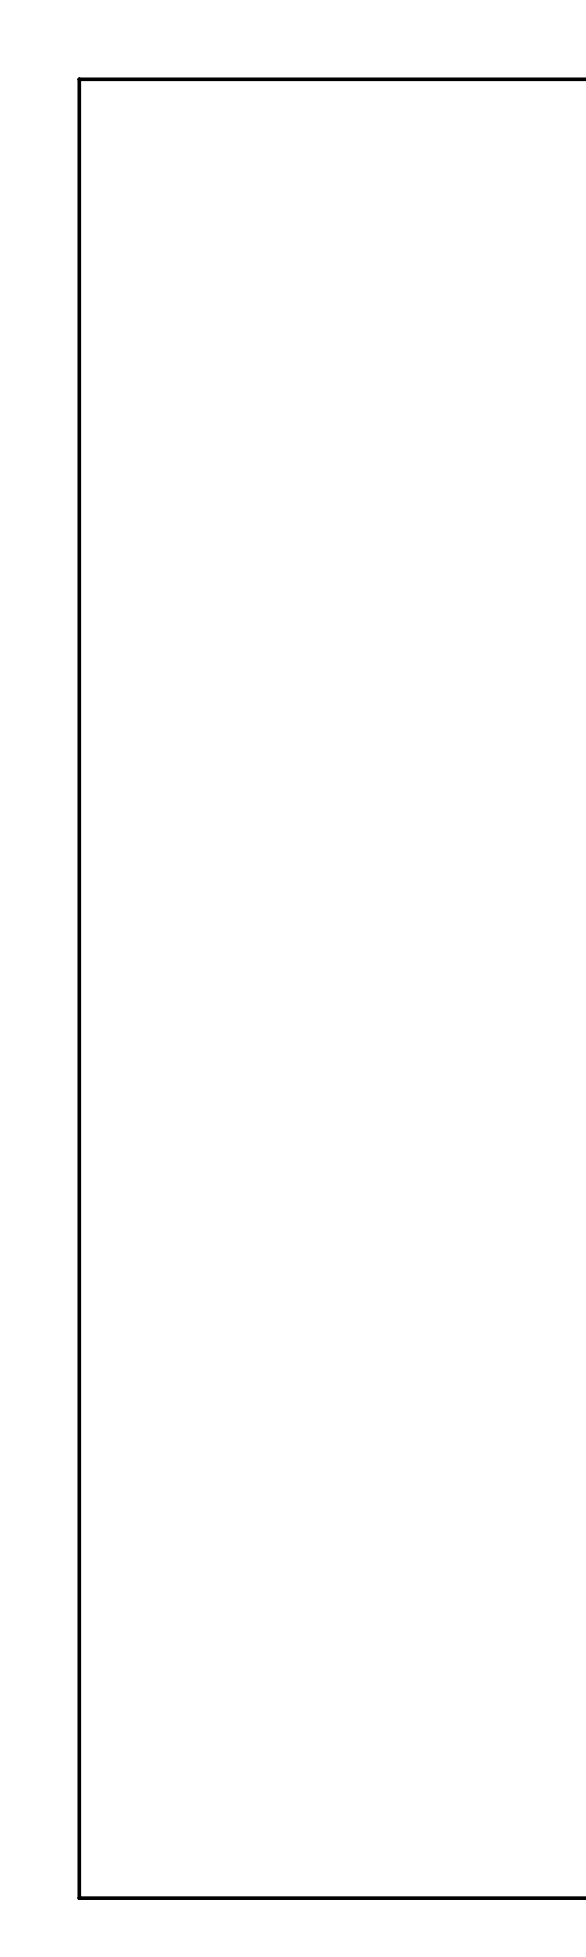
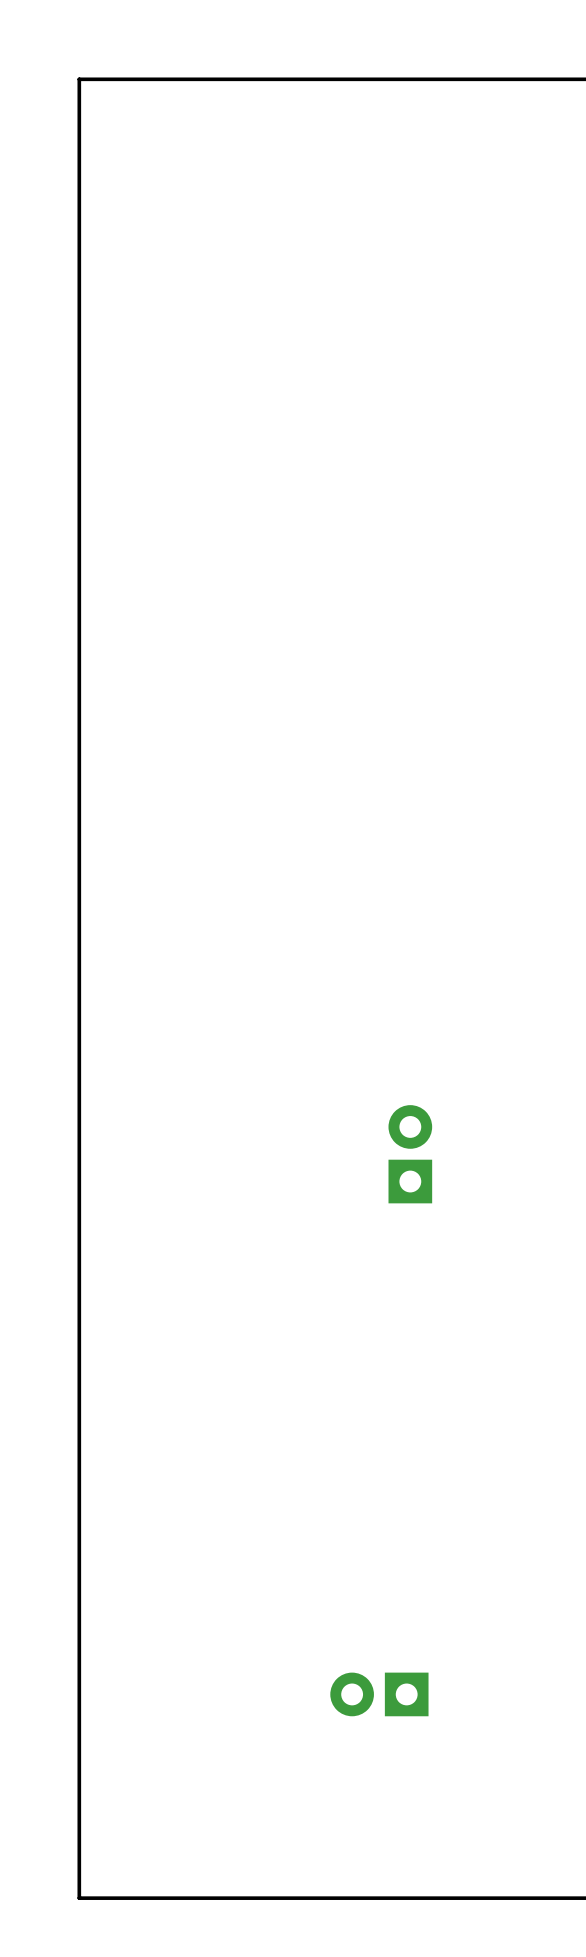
part: none -> (410, 1154)
part: none -> (379, 1694)

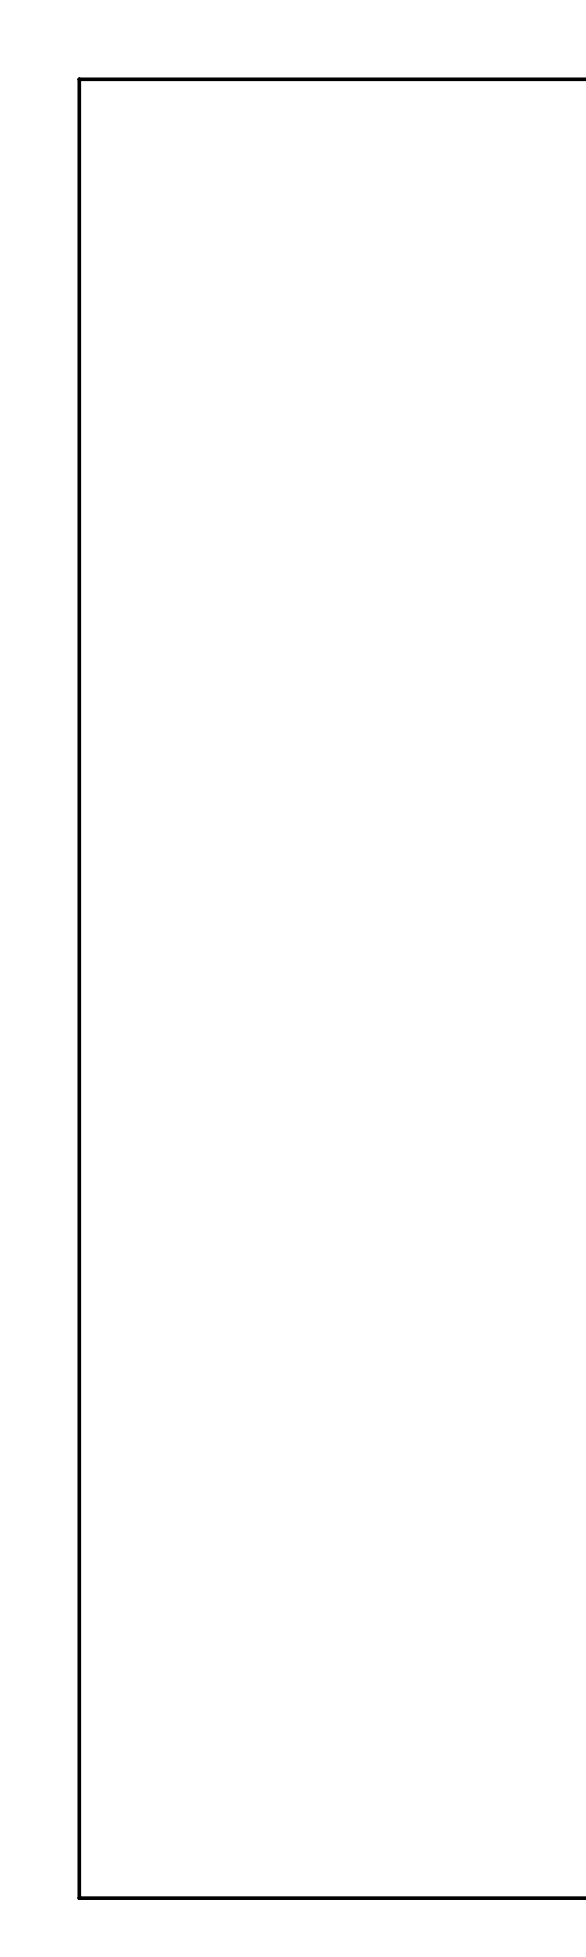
part: (410, 1154) -> none
part: (379, 1694) -> none

